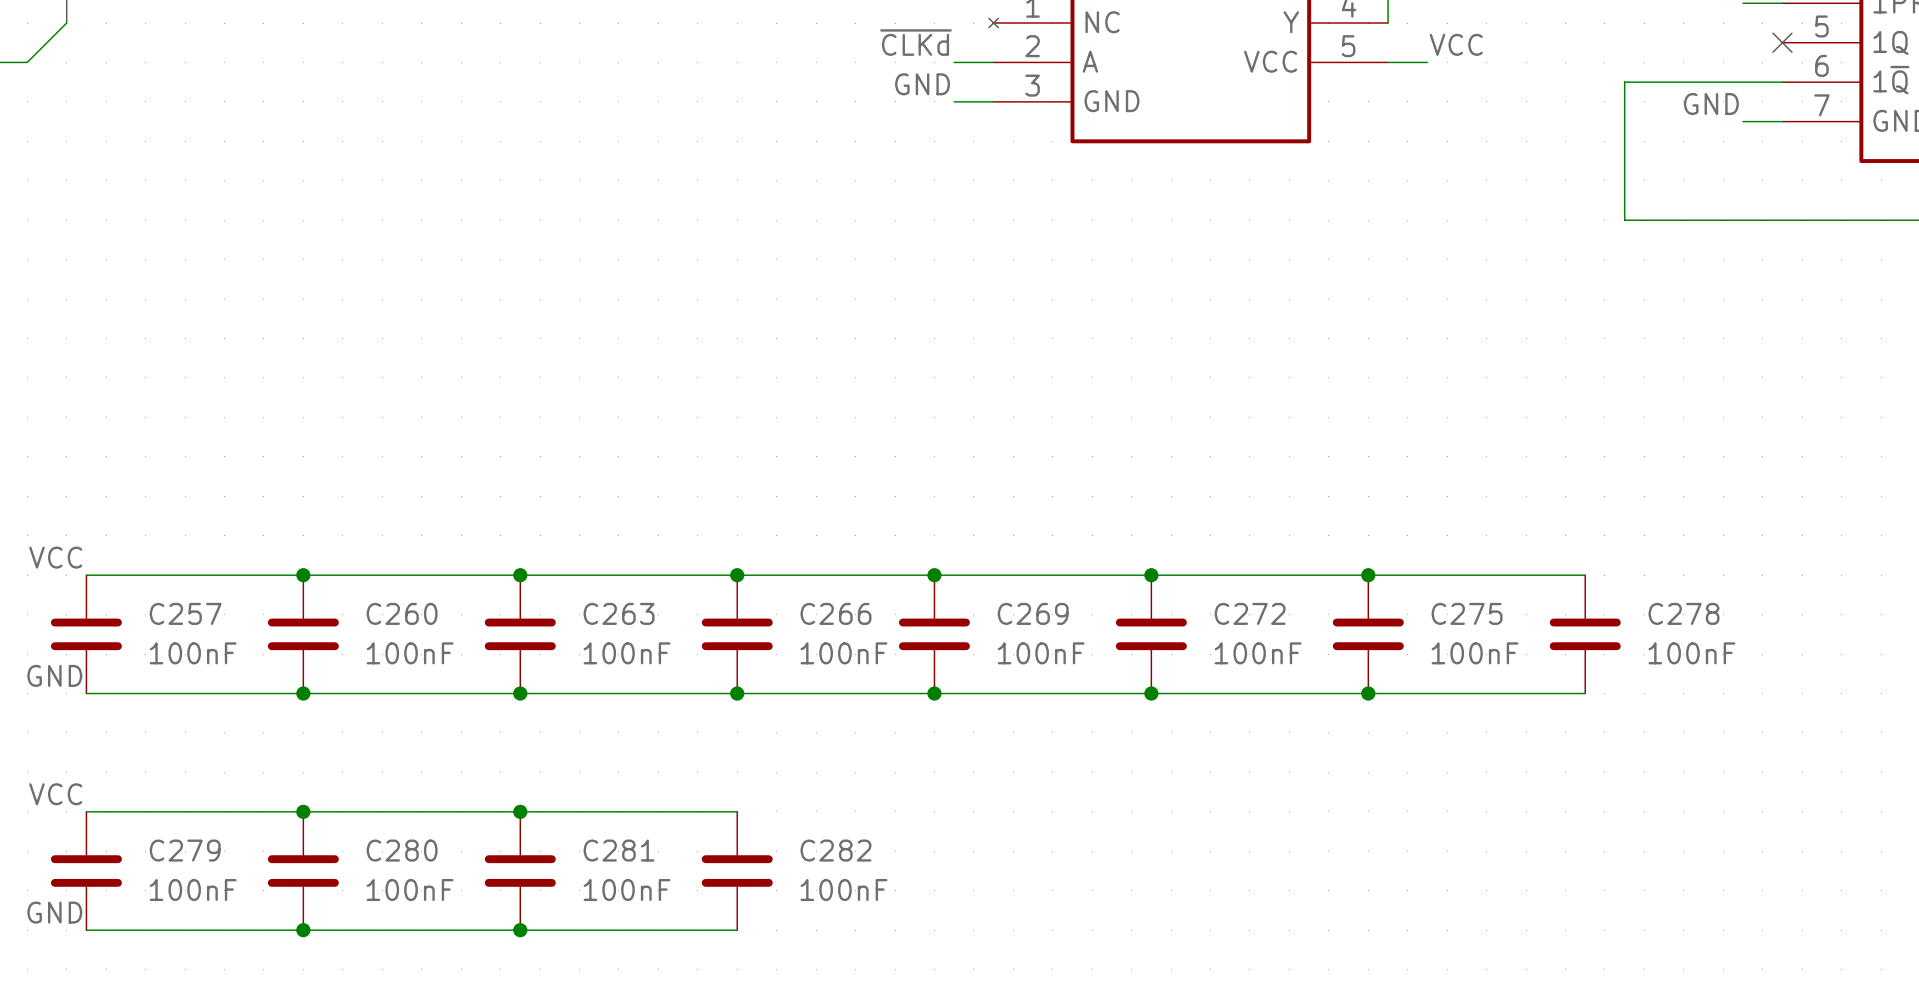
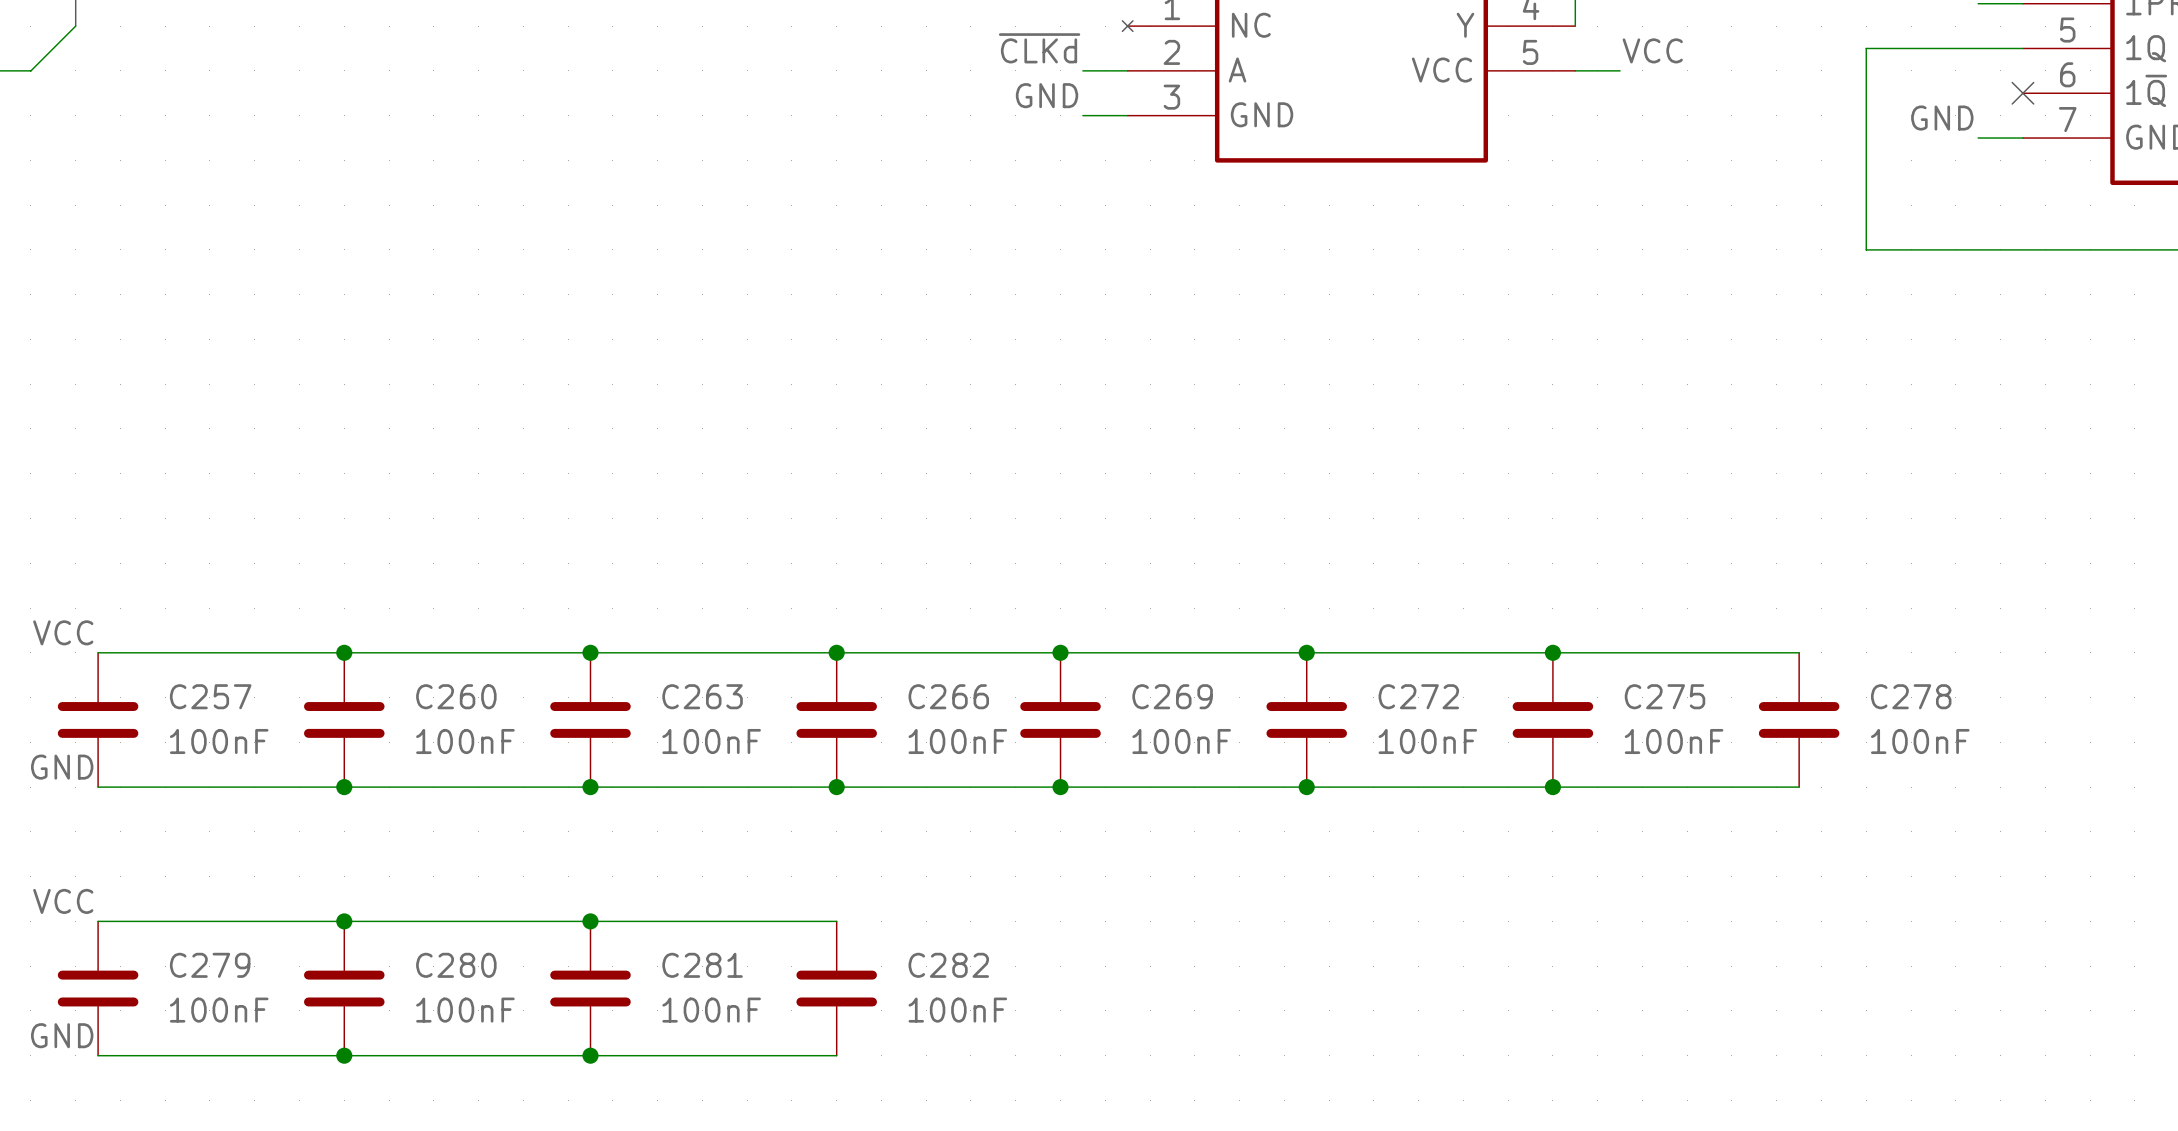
no-connect mark position: (1782, 42) -> (2022, 93)
wire: (1782, 82) (1624, 82) (1624, 220) (1644, 220) -> (2022, 48) (1866, 48) (1866, 249)

